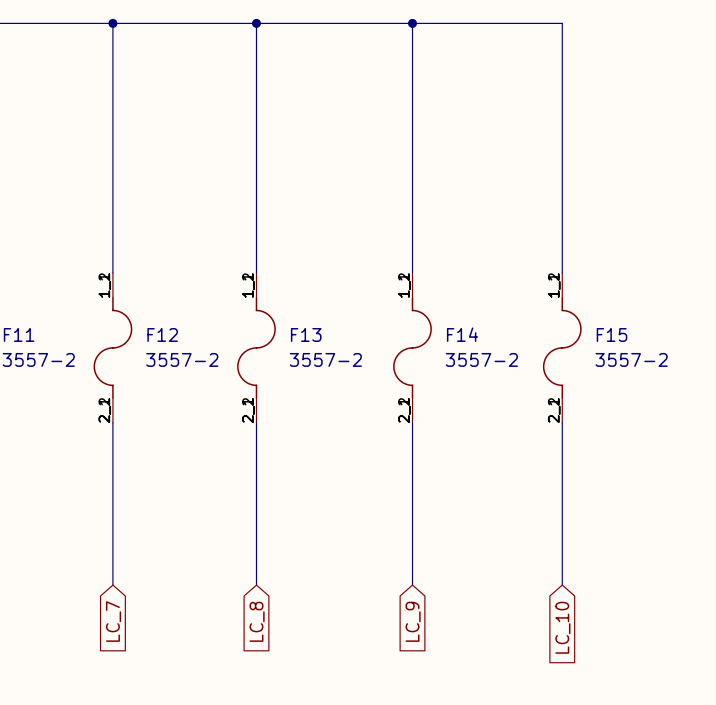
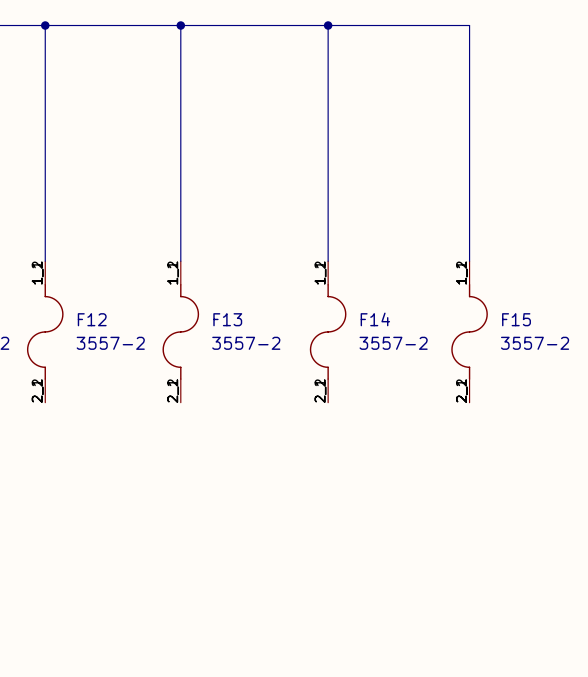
wire: (112, 422) (112, 585) -> none
wire: (256, 422) (256, 585) -> none
wire: (412, 422) (412, 585) -> none
wire: (562, 422) (562, 585) -> none
global label: LC_7 (113, 621) -> none
global label: LC_8 (257, 621) -> none
global label: LC_9 (413, 621) -> none
global label: LC_10 (562, 627) -> none

